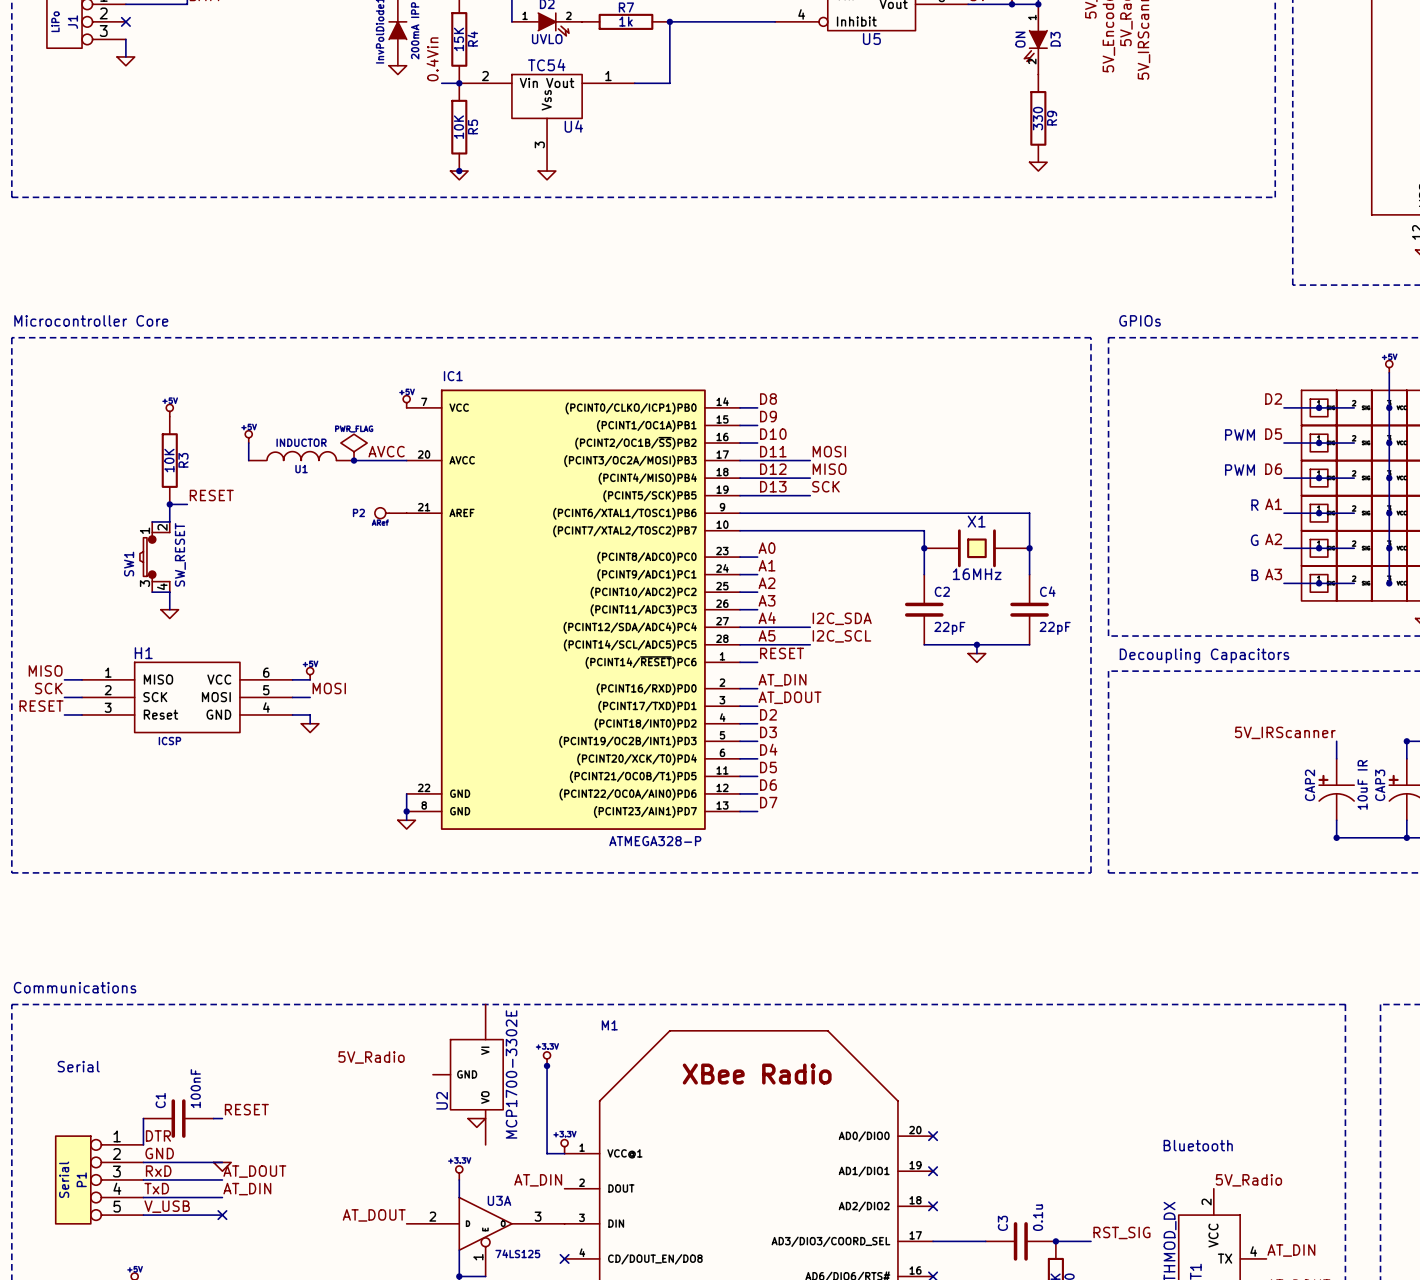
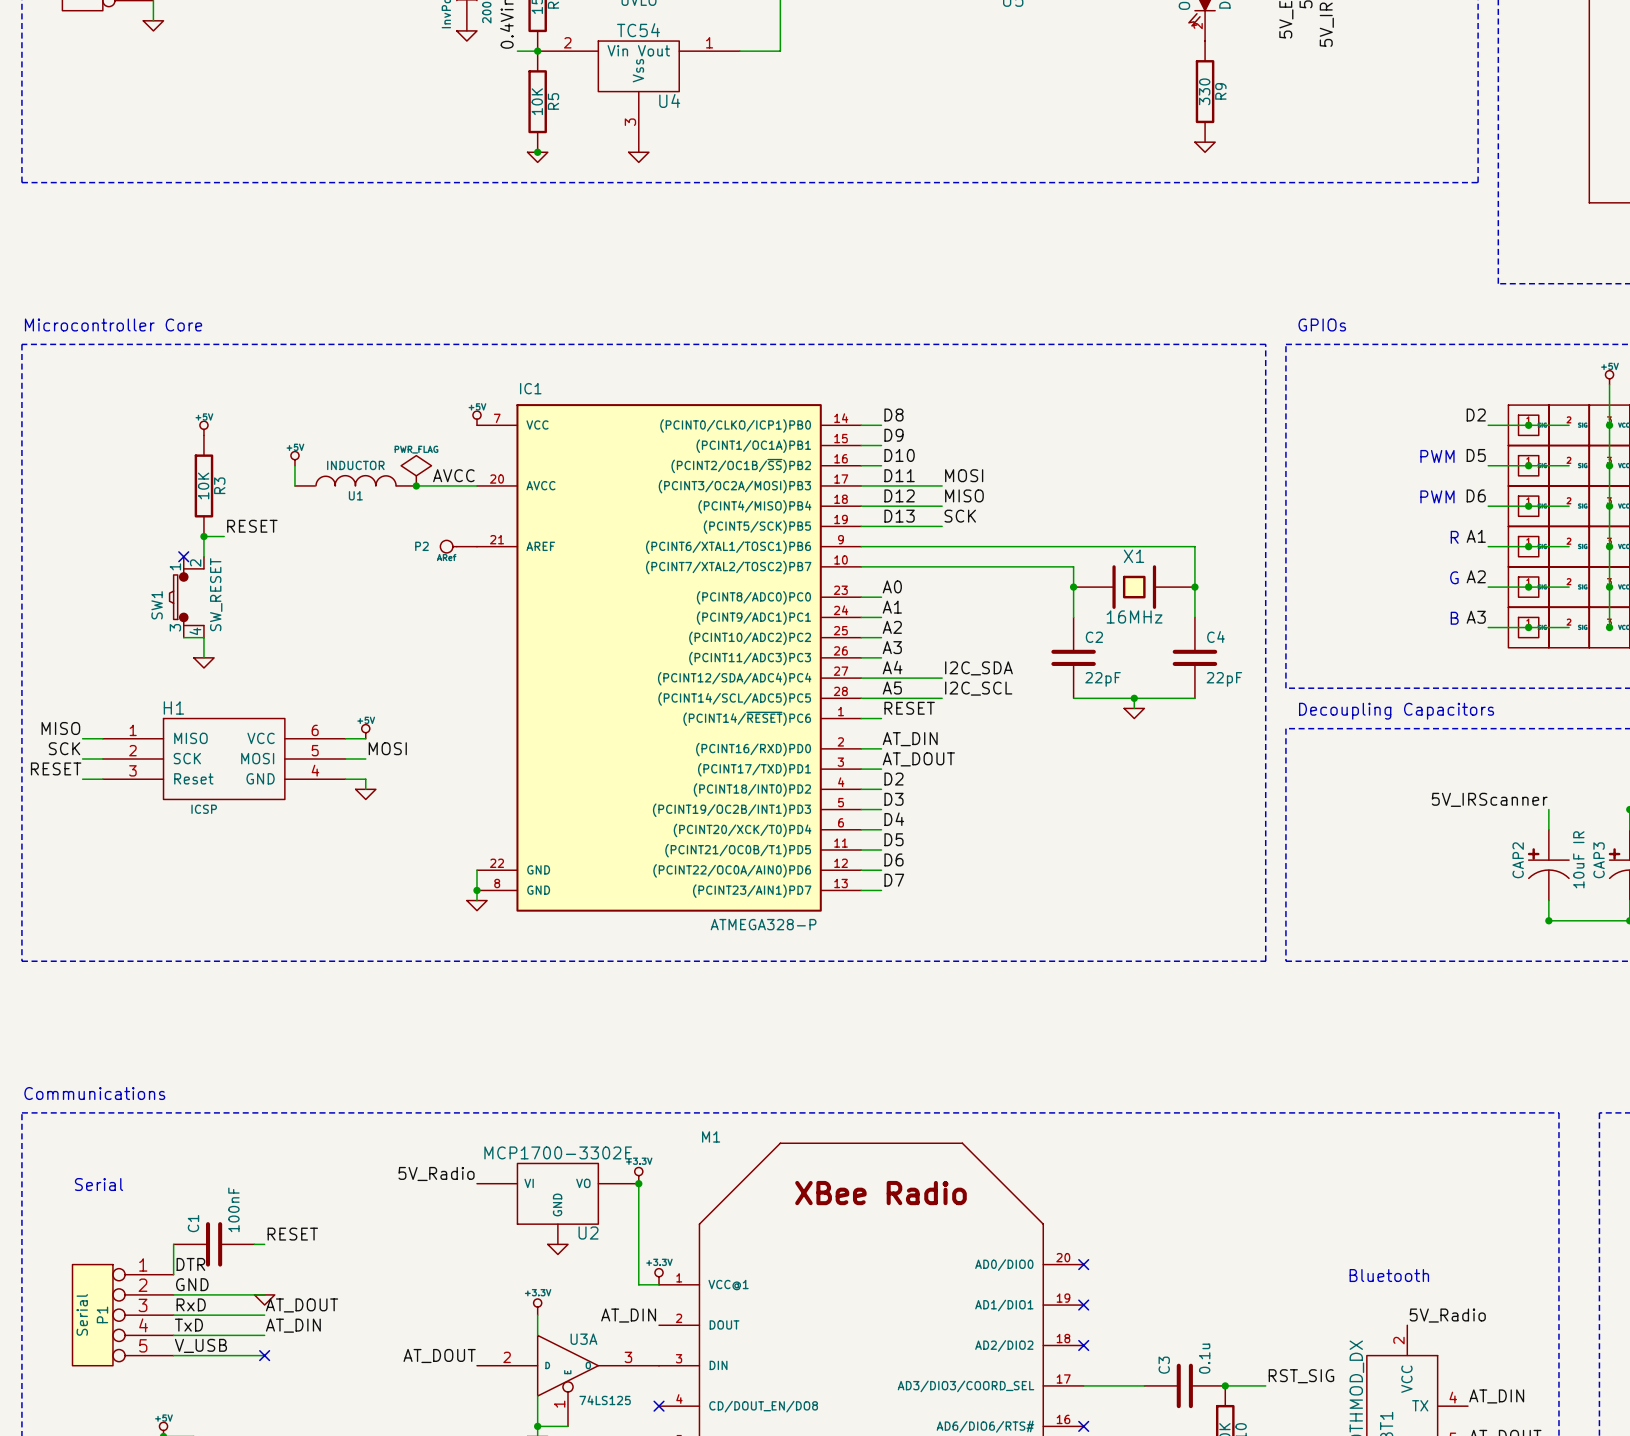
wire: (152, 521) (169, 521) -> none
no-connect mark: none -> (183, 556)
U2 rotation: 0° (476, 1074) -> 90° counterclockwise (557, 1193)

